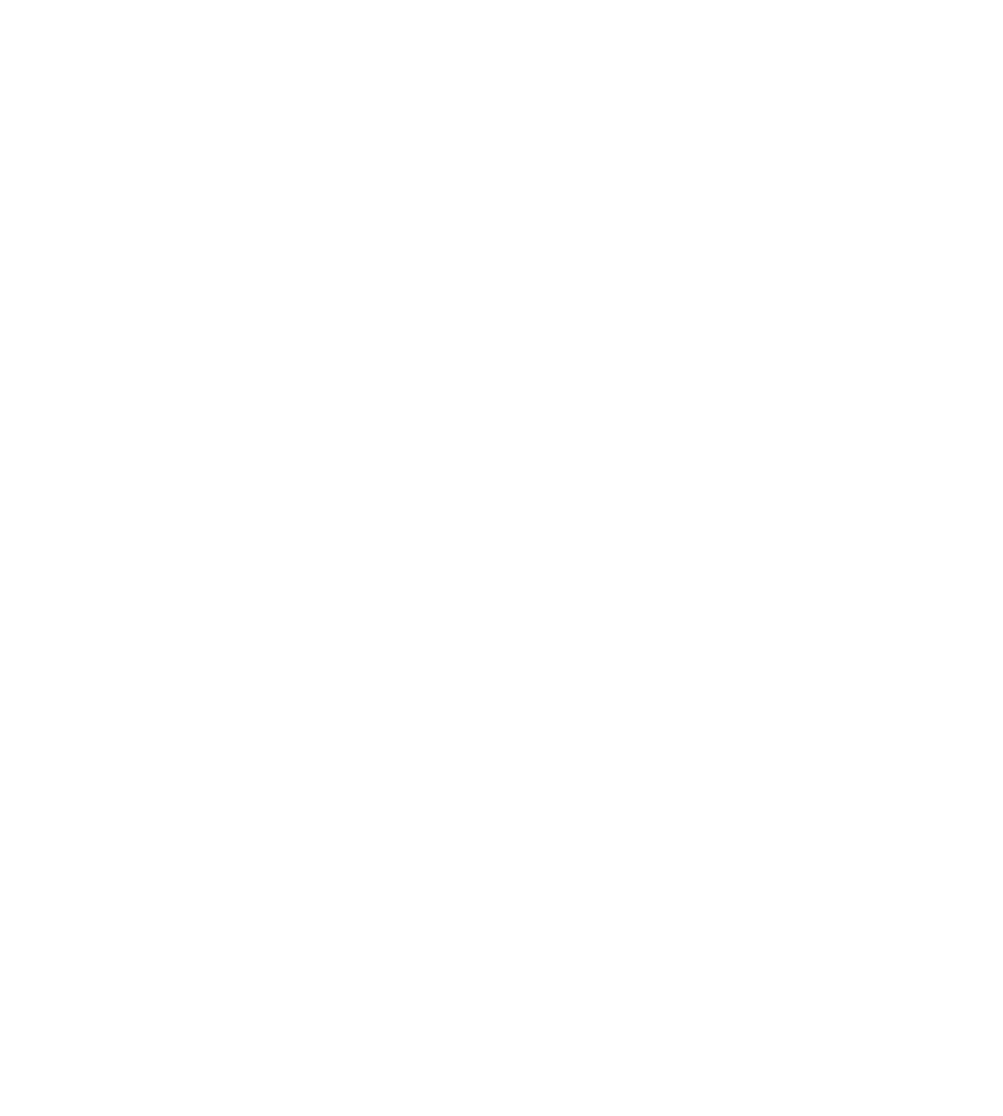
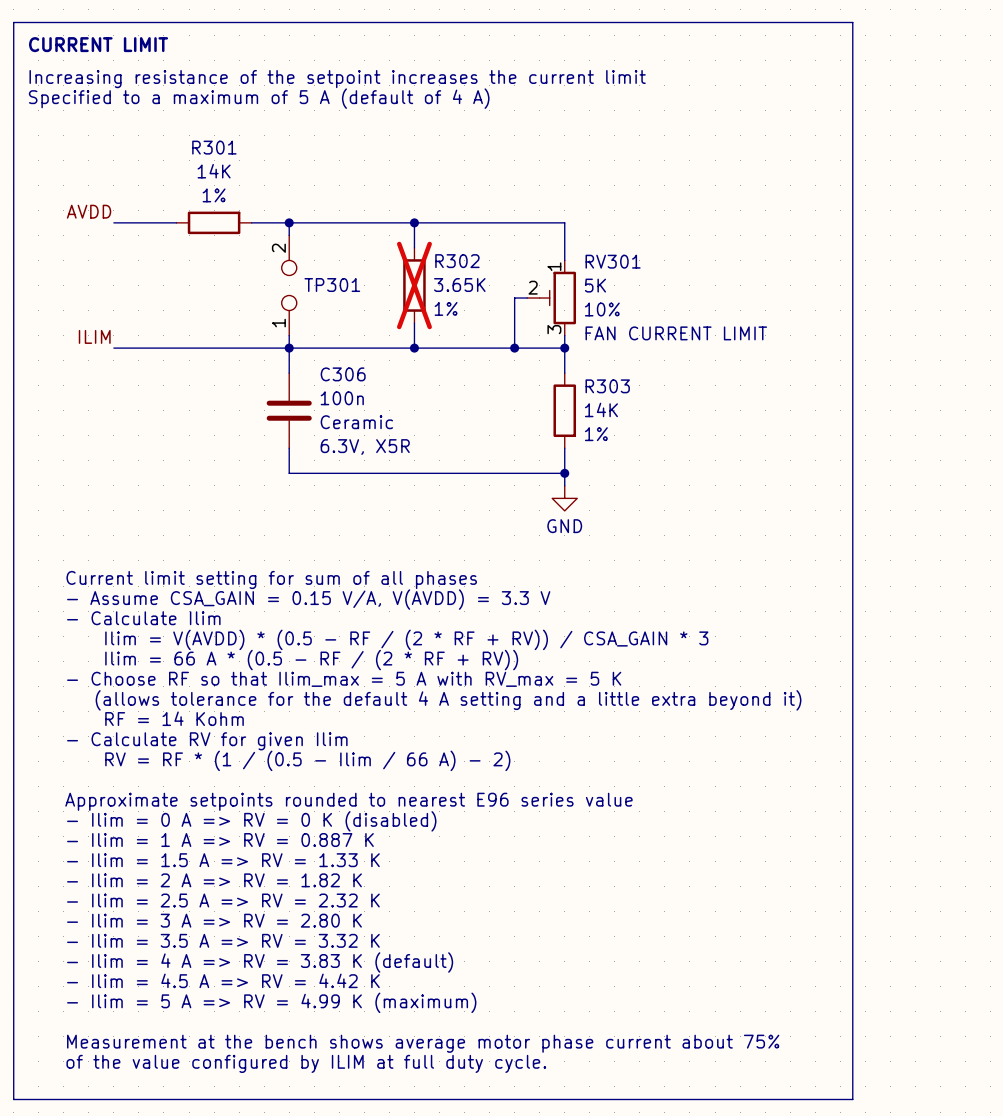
line: none -> (13, 22) (852, 22) (852, 1099) (13, 1099) (13, 22)
text: none -> CURRENT LIMIT (98, 44)
text: none -> Increasing resistance of the setpoint increases the current limit (337, 79)
text: none -> Specified to a maximum of 5 A (default of 4 A) (259, 98)
label: none -> AVDD (89, 211)
wire: none -> (113, 222) (176, 222)
R301: none -> 14K (214, 222)
wire: none -> (251, 222) (564, 222) (564, 260)
wire: none -> (289, 222) (289, 235)
junction: none -> (289, 222)
wire: none -> (414, 222) (414, 247)
junction: none -> (414, 222)
TP301: none -> (289, 285)
R302: none -> 3.65K (414, 285)
wire: none -> (527, 298) (514, 298) (514, 348)
RV301: none -> 5K (551, 298)
wire: none -> (414, 323) (414, 348)
wire: none -> (289, 335) (289, 373)
wire: none -> (564, 335) (564, 373)
label: none -> ILIM (94, 336)
wire: none -> (113, 348) (564, 348)
junction: none -> (289, 348)
junction: none -> (414, 348)
junction: none -> (514, 348)
junction: none -> (564, 348)
C306: none -> 100n (289, 410)
R303: none -> 14K (564, 410)
wire: none -> (289, 448) (289, 473) (564, 473)
wire: none -> (564, 448) (564, 485)
junction: none -> (564, 473)
power symbol: none -> GND (564, 498)
text: none -> Current limit setting for sum of all phases (271, 580)
text: none -> - Assume CSA_GAIN = 0.15 V/A, V(AVDD) = 3.3 V (308, 599)
text: none -> - Calculate Ilim (143, 618)
text: none -> Ilim = V(AVDD) * (0.5 - RF / (2 * RF + RV)) / CSA_GAIN * 3 (406, 639)
text: none -> Ilim = 66 A * (0.5 - RF / (2 * RF + RV)) (311, 660)
text: none -> - Choose RF so that Ilim_max = 5 A with RV_max = 5 K (344, 679)
text: none -> (allows tolerance for the default 4 A setting and a little extra beyond it) (448, 700)
text: none -> RF = 14 Kohm (174, 718)
text: none -> - Calculate RV for given Ilim (207, 741)
text: none -> RV = RF * (1 / (0.5 - Ilim / 66 A) - 2) (307, 760)
text: none -> Approximate setpoints rounded to nearest E96 series value (348, 801)
text: none -> - Ilim = 0 A => RV = 0 K (disabled) (251, 821)
text: none -> - Ilim = 1 A => RV = 0.887 K (220, 840)
text: none -> - Ilim = 1.5 A => RV = 1.33 K (223, 860)
text: none -> - Ilim = 2 A => RV = 1.82 K (214, 880)
text: none -> - Ilim = 2.5 A => RV = 2.32 K (223, 900)
text: none -> - Ilim = 3 A => RV = 2.80 K (214, 920)
text: none -> - Ilim = 3.5 A => RV = 3.32 K (223, 940)
text: none -> - Ilim = 4 A => RV = 3.83 K (default) (260, 962)
text: none -> - Ilim = 4.5 A => RV = 4.42 K (223, 980)
text: none -> - Ilim = 5 A => RV = 4.99 K (maximum) (271, 1002)
text: none -> Measurement at the bench shows average motor phase current about 75% (423, 1043)
text: none -> of the value configured by ILIM at full duty cycle. (306, 1063)

